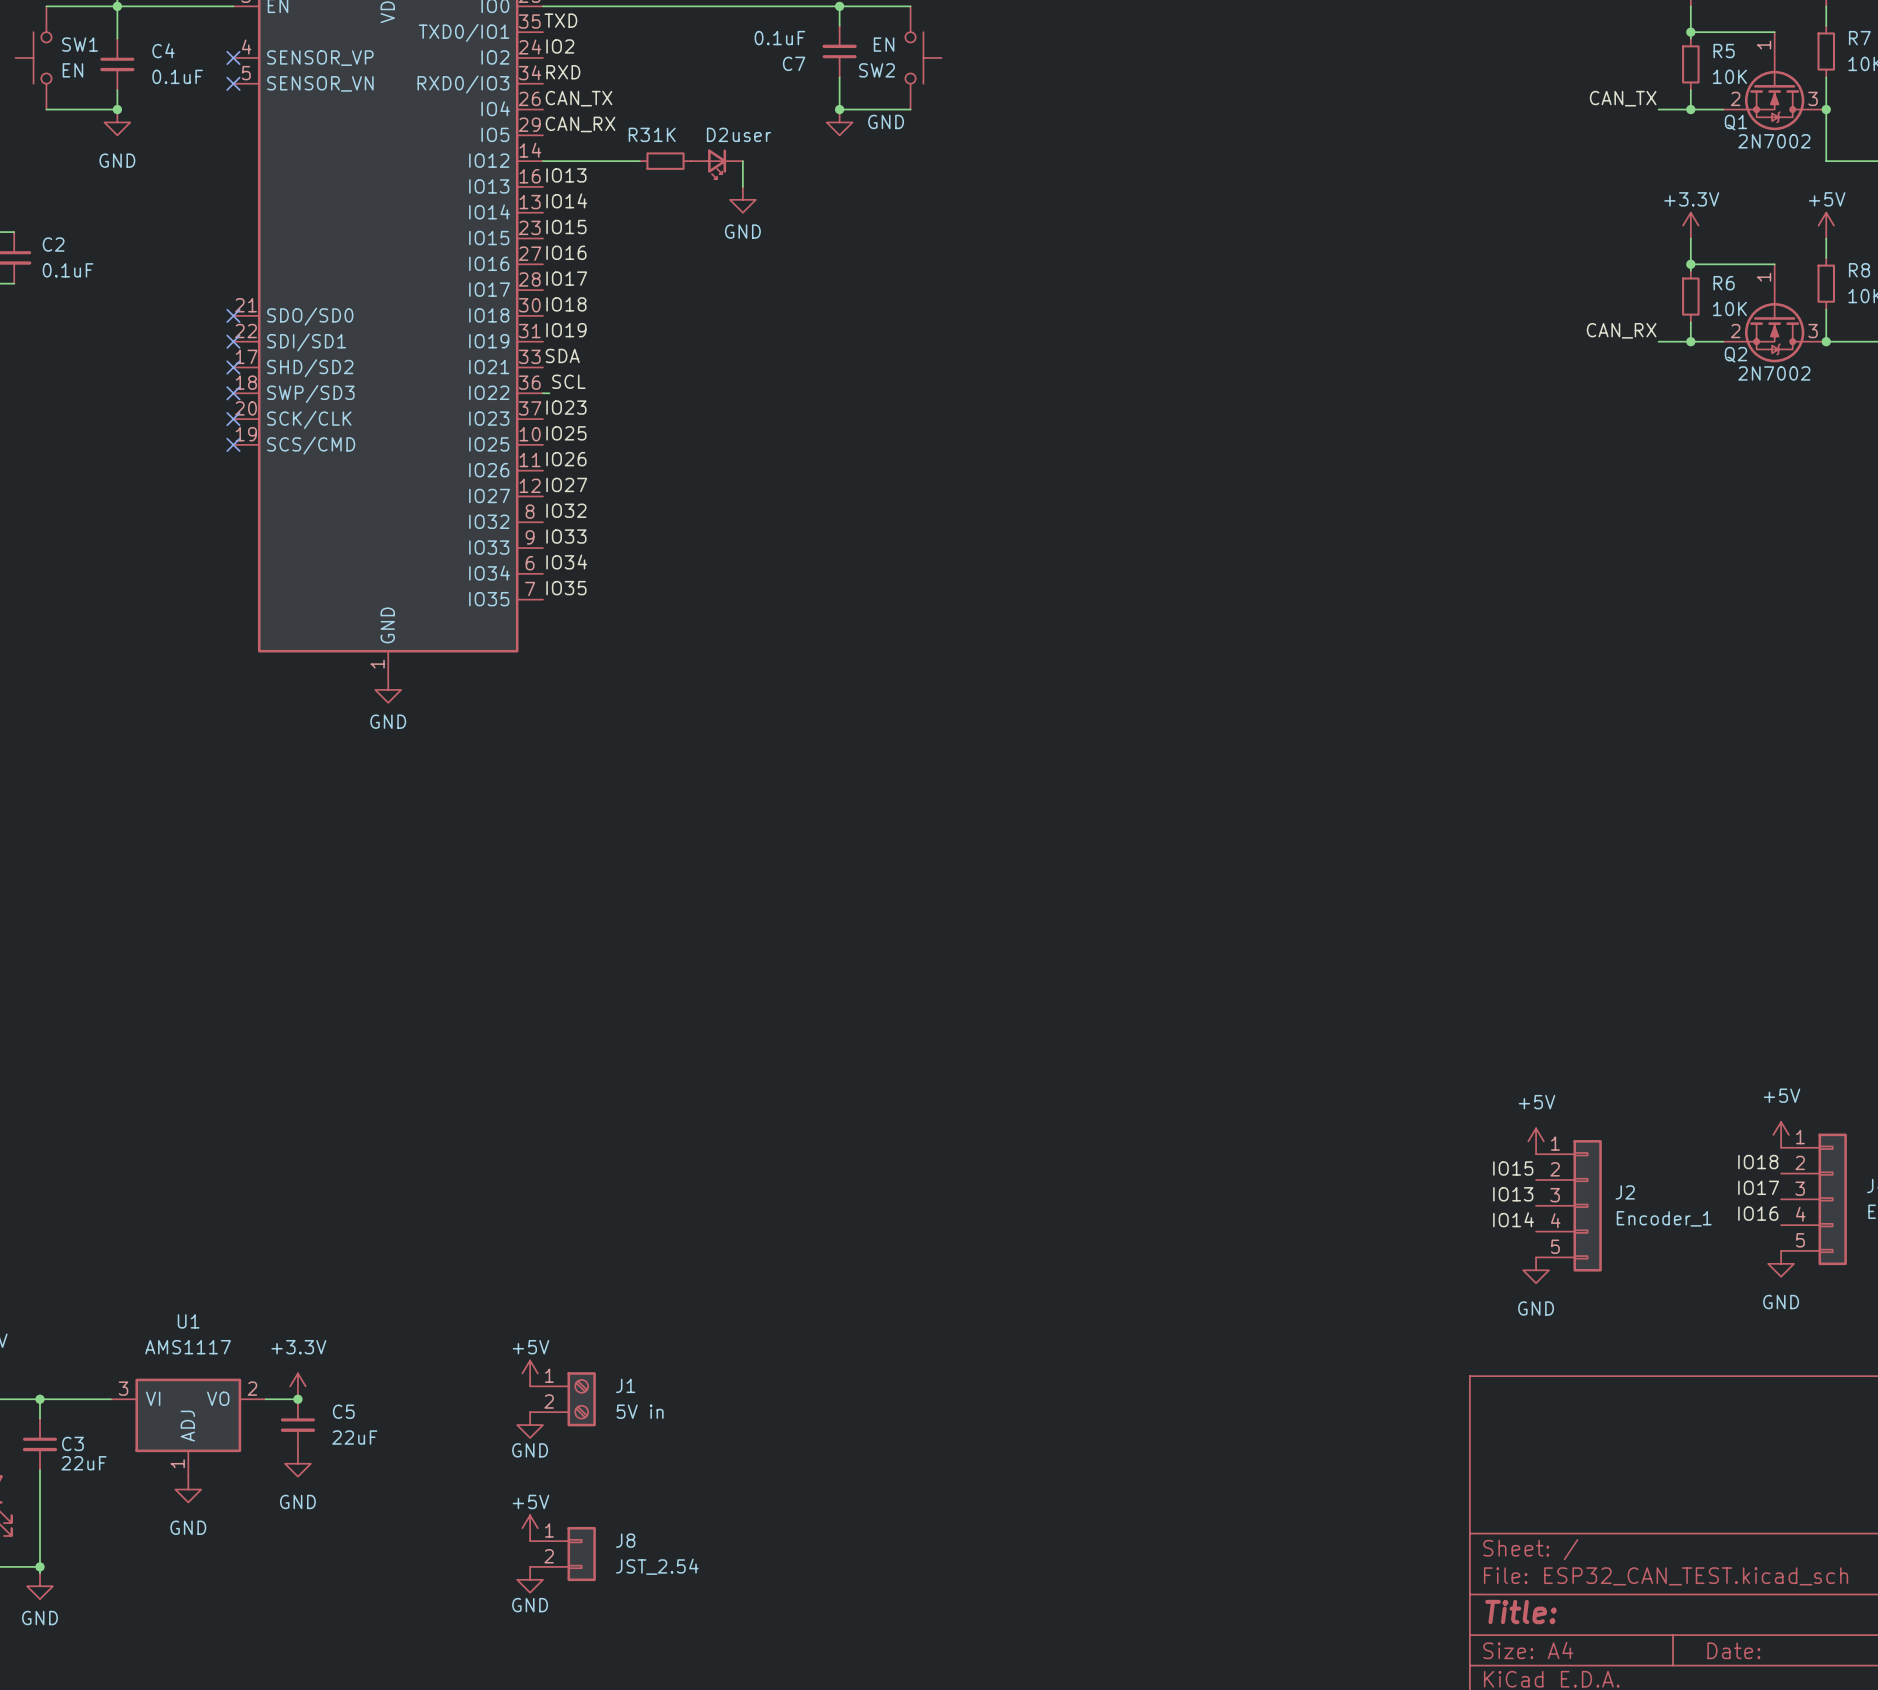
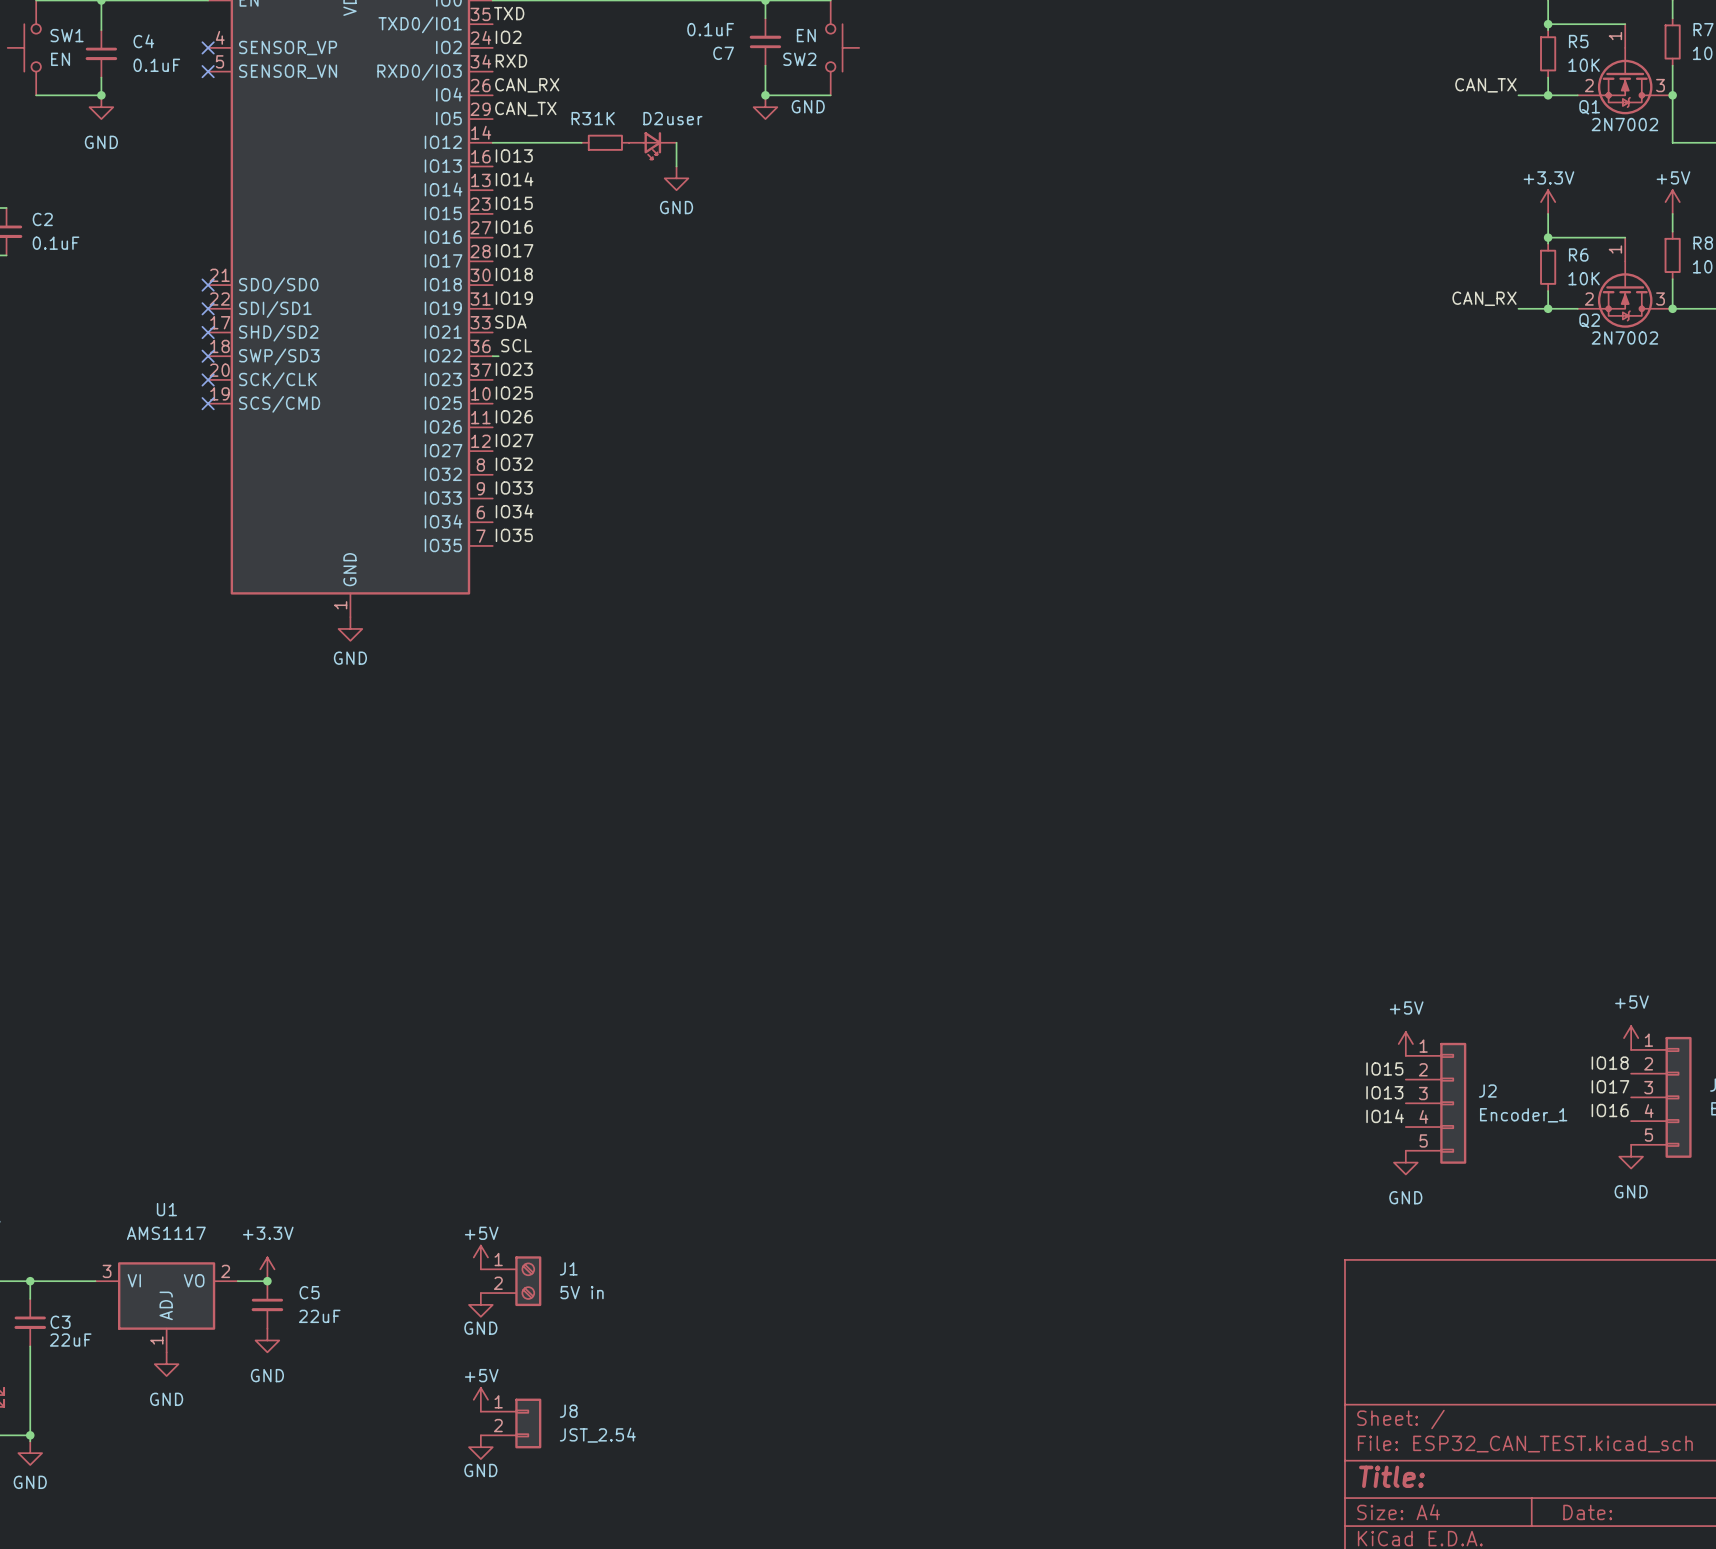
label: CAN_TX (579, 98) -> CAN_RX (527, 85)
label: CAN_RX (580, 124) -> CAN_TX (525, 109)

